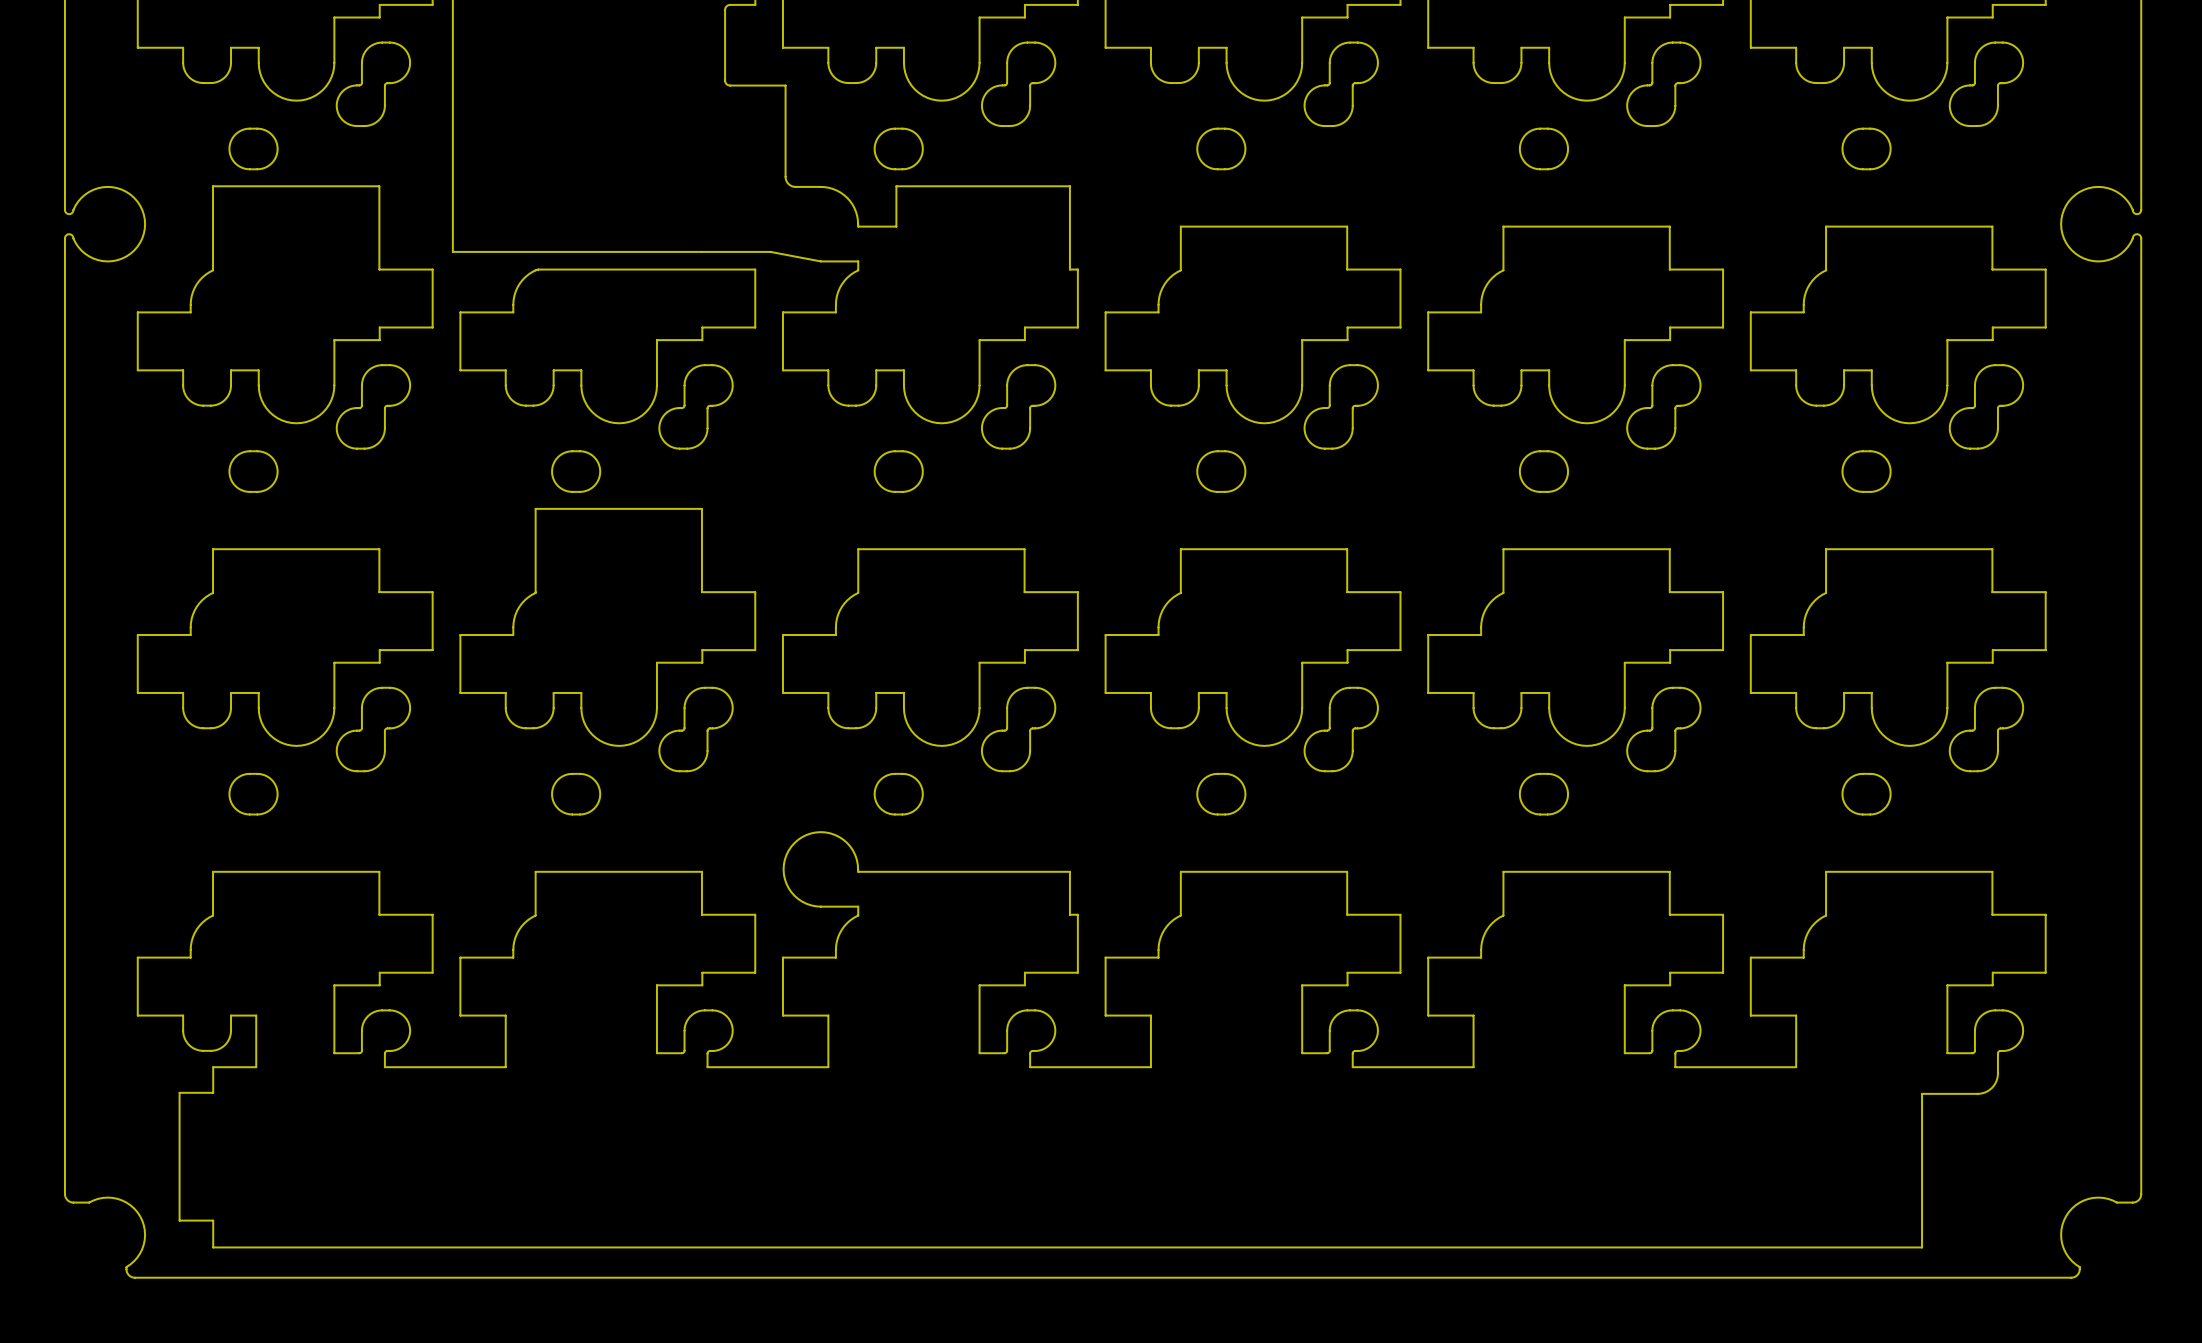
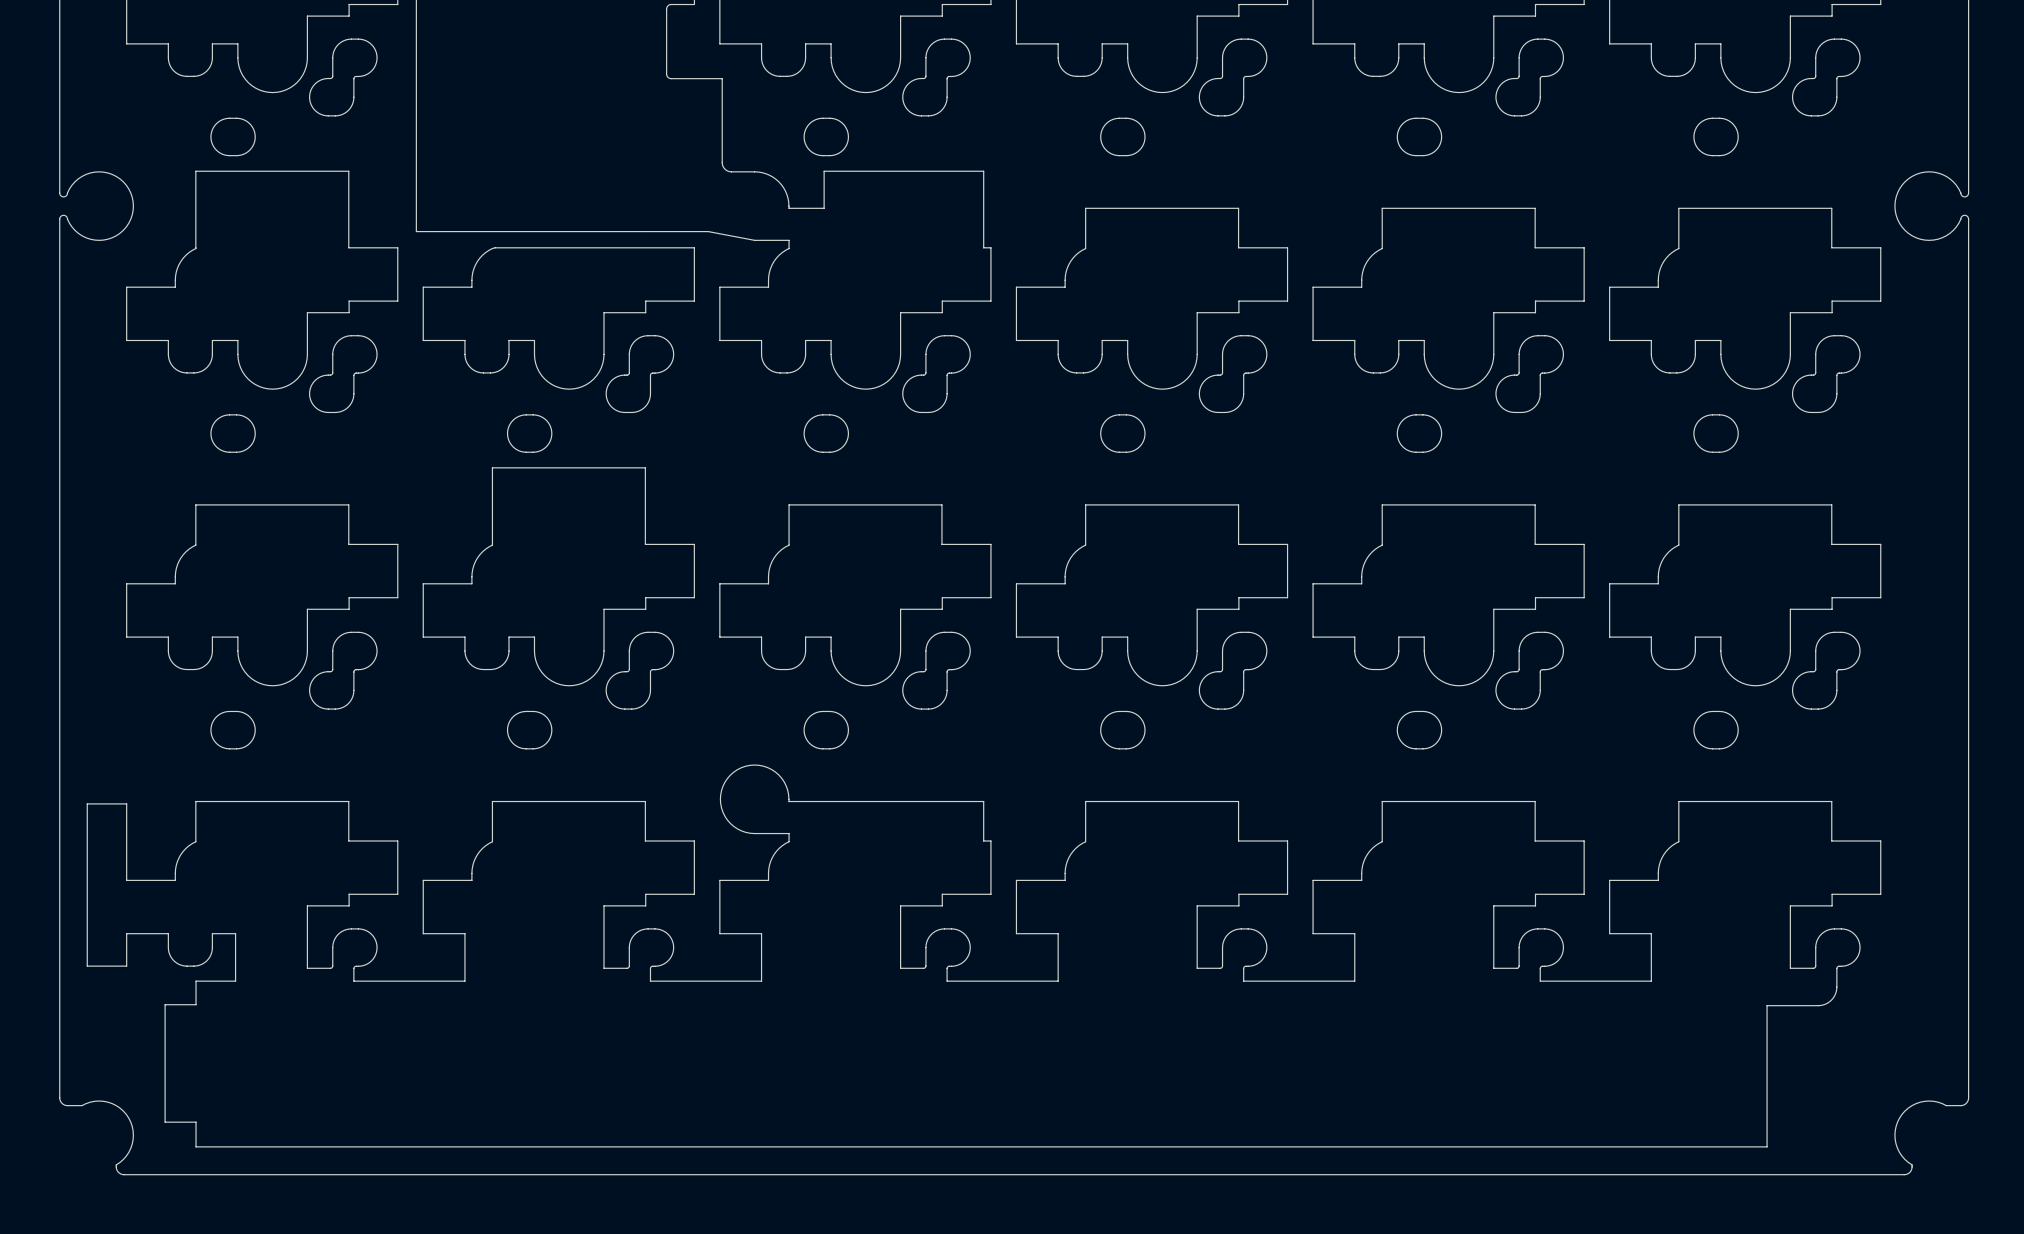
board edge: (137, 957) (137, 1015) -> (126, 880) (126, 803) (87, 803) (87, 966) (126, 966) (126, 933)

